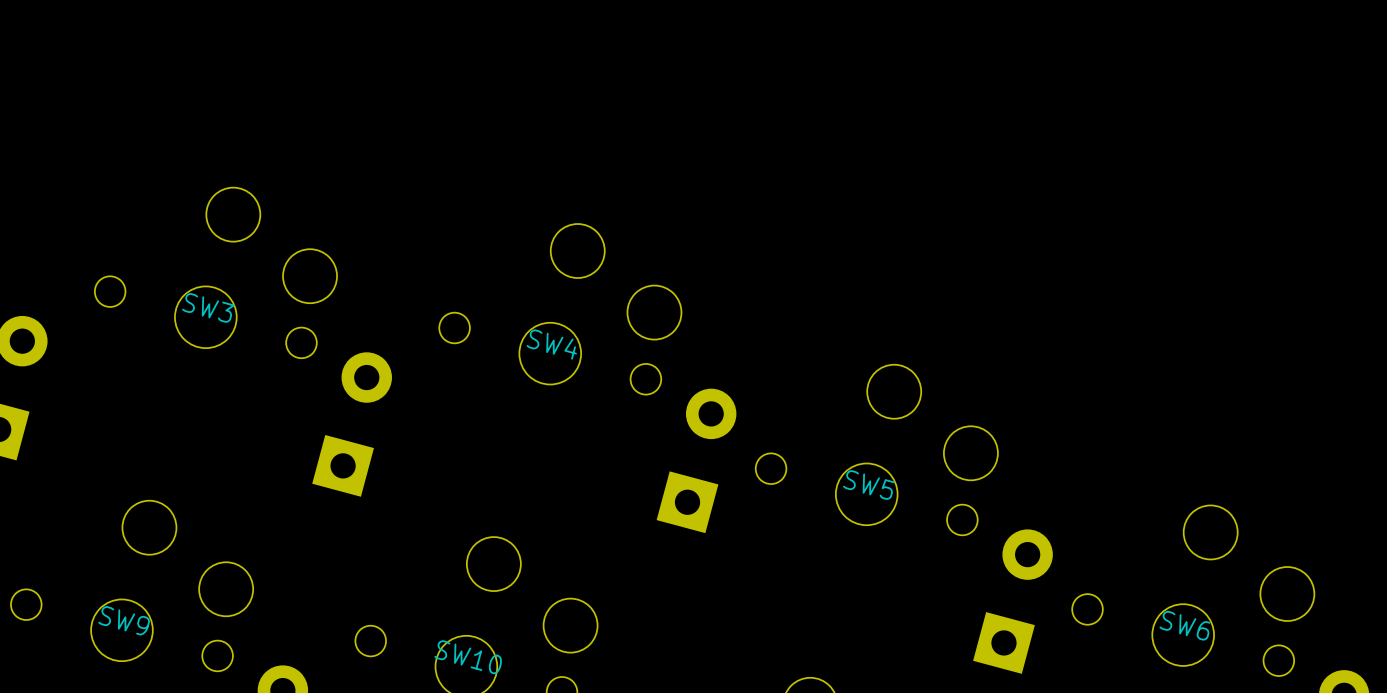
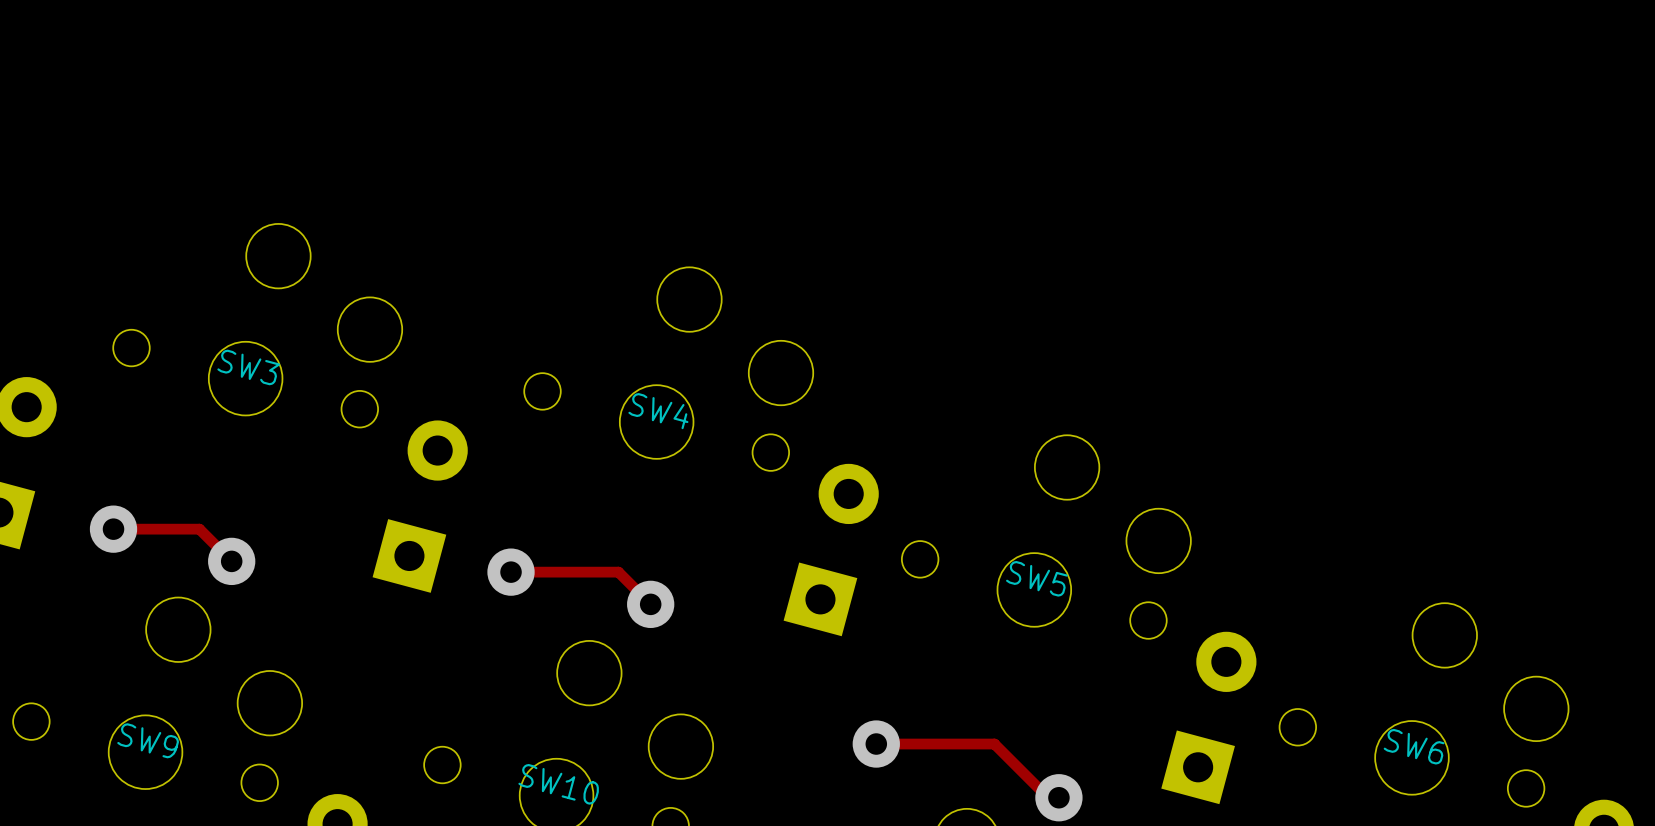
track: none -> (113, 529) (199, 529) (231, 561)
via: none -> (113, 529)
via: none -> (231, 561)
track: none -> (511, 572) (618, 572) (650, 604)
via: none -> (511, 572)
via: none -> (650, 604)
track: none -> (876, 744) (994, 744) (1048, 797) (1058, 797)
via: none -> (876, 744)
via: none -> (1058, 797)

